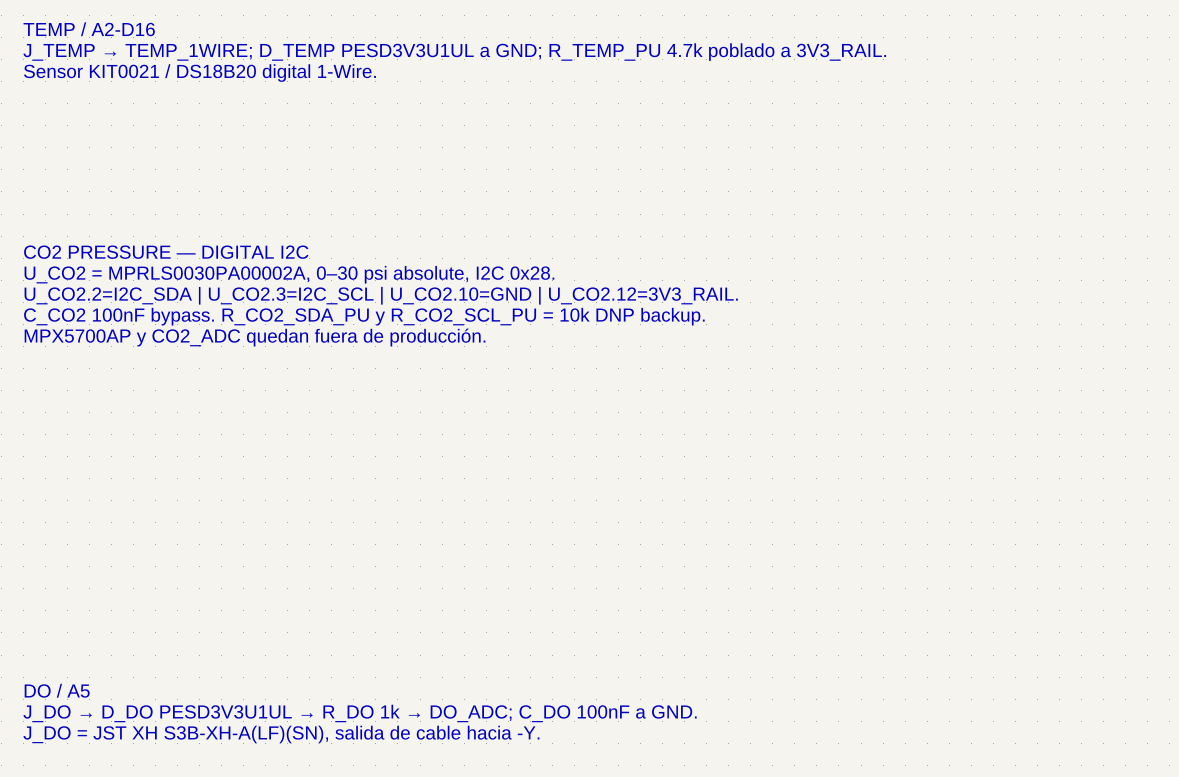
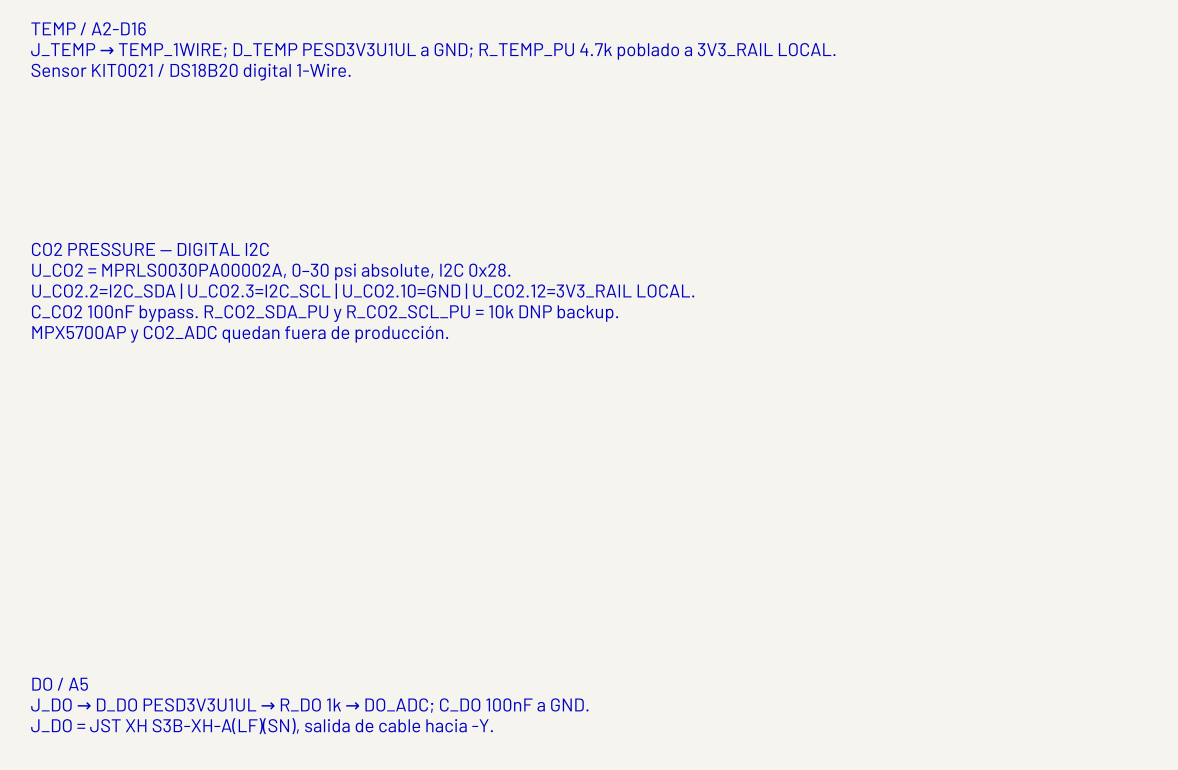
text: J_TEMP → TEMP_1WIRE; D_TEMP PESD3V3U1UL a GND; R_TEMP_PU 4.7k poblado a 3V3_RAIL. (454, 52) -> J_TEMP → TEMP_1WIRE; D_TEMP PESD3V3U1UL a GND; R_TEMP_PU 4.7k poblado a 3V3_RAIL LOCAL. (433, 51)
text: U_CO2.2=I2C_SDA | U_CO2.3=I2C_SCL | U_CO2.10=GND | U_CO2.12=3V3_RAIL. (381, 295) -> U_CO2.2=I2C_SDA | U_CO2.3=I2C_SCL | U_CO2.10=GND | U_CO2.12=3V3_RAIL LOCAL. (363, 291)

